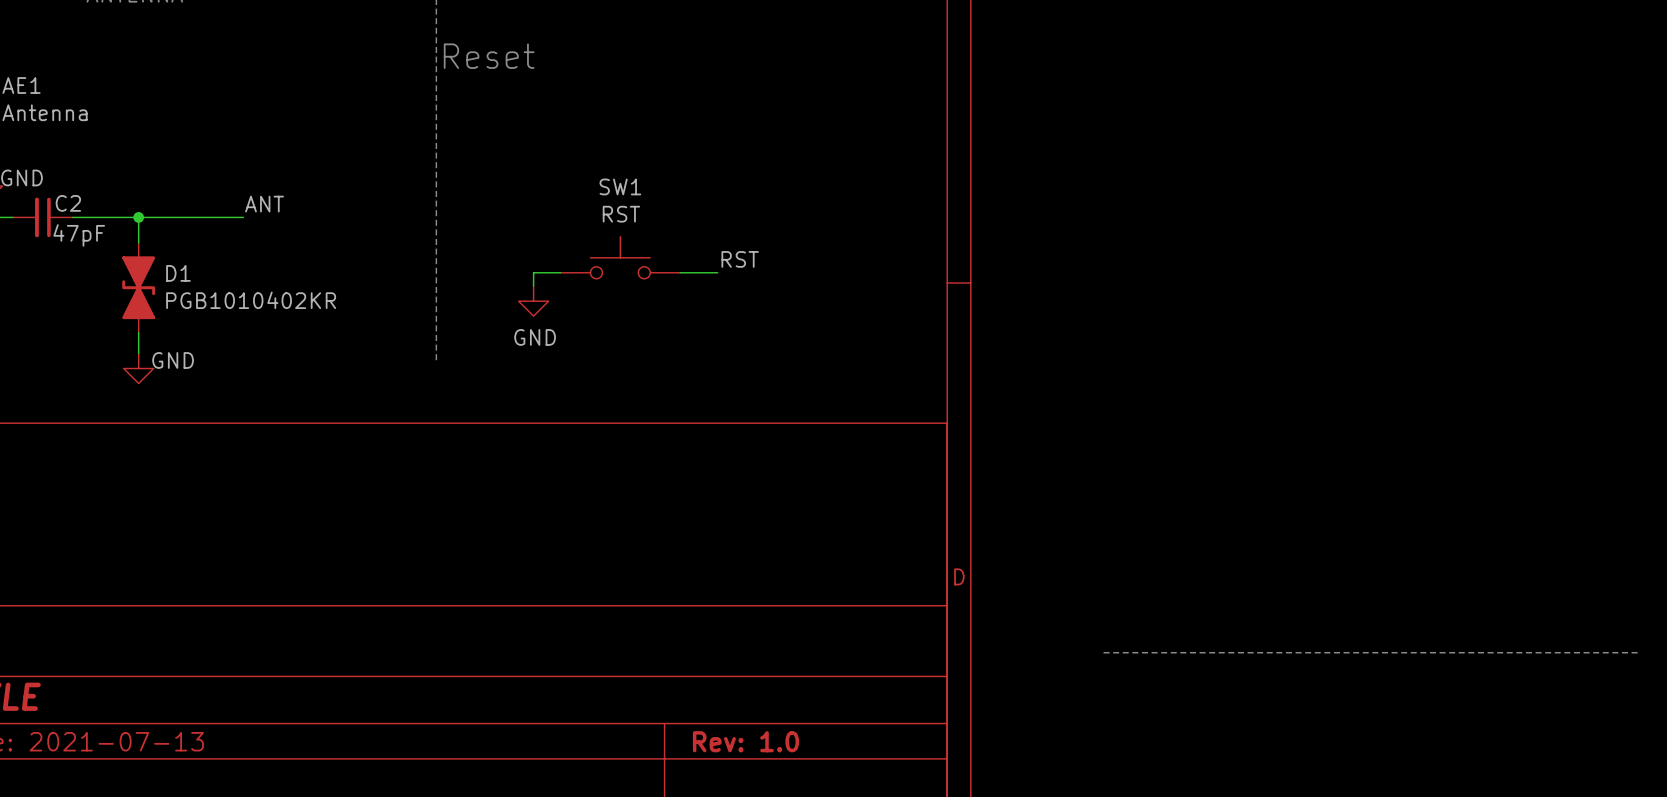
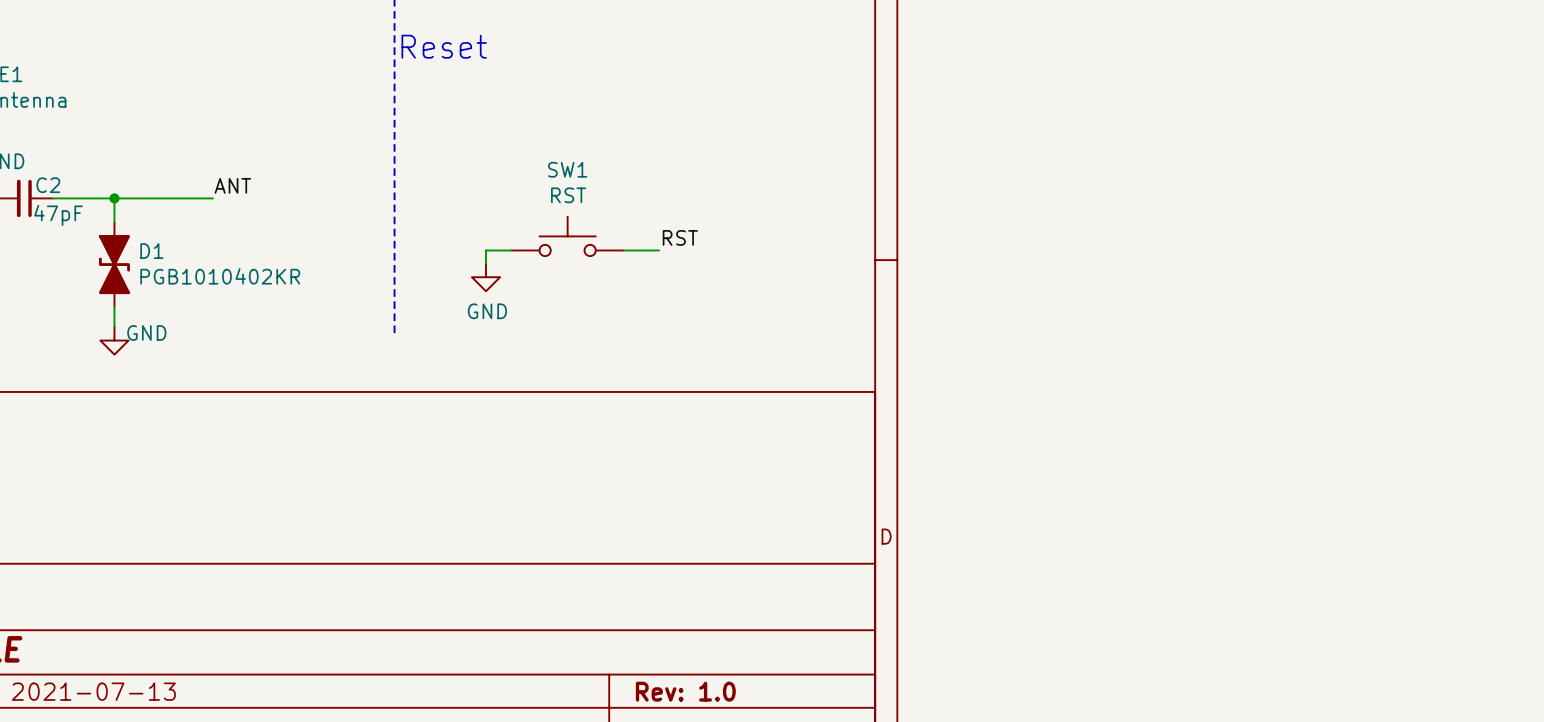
line: (1103, 652) (1640, 652) -> none

